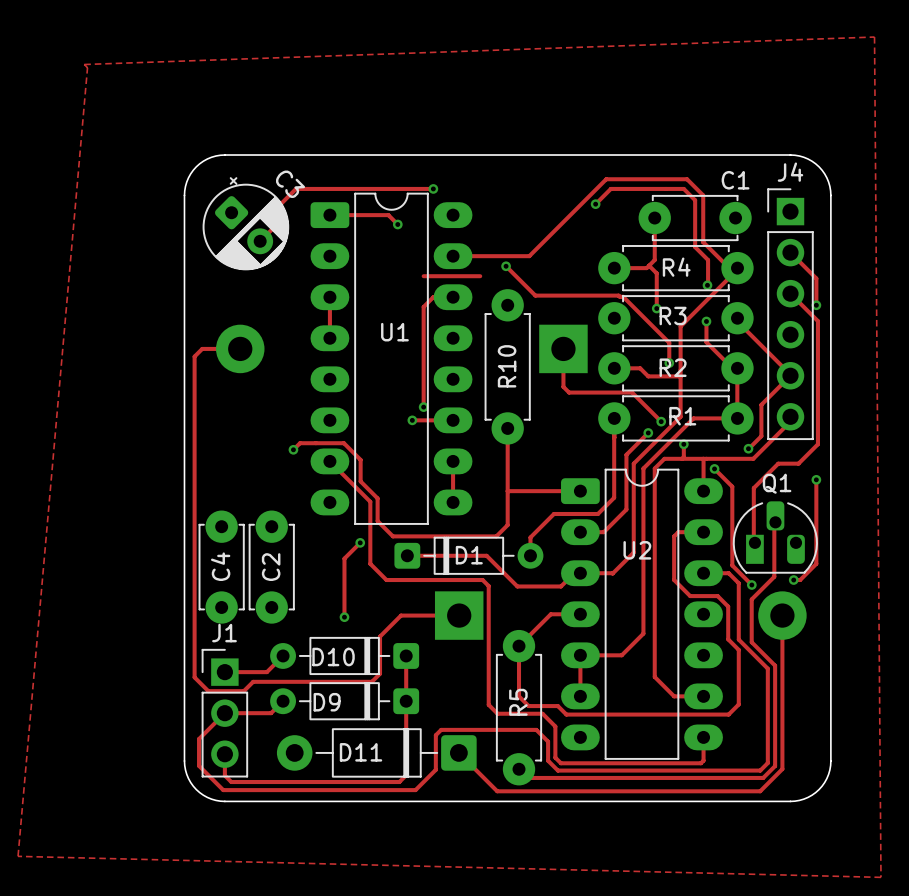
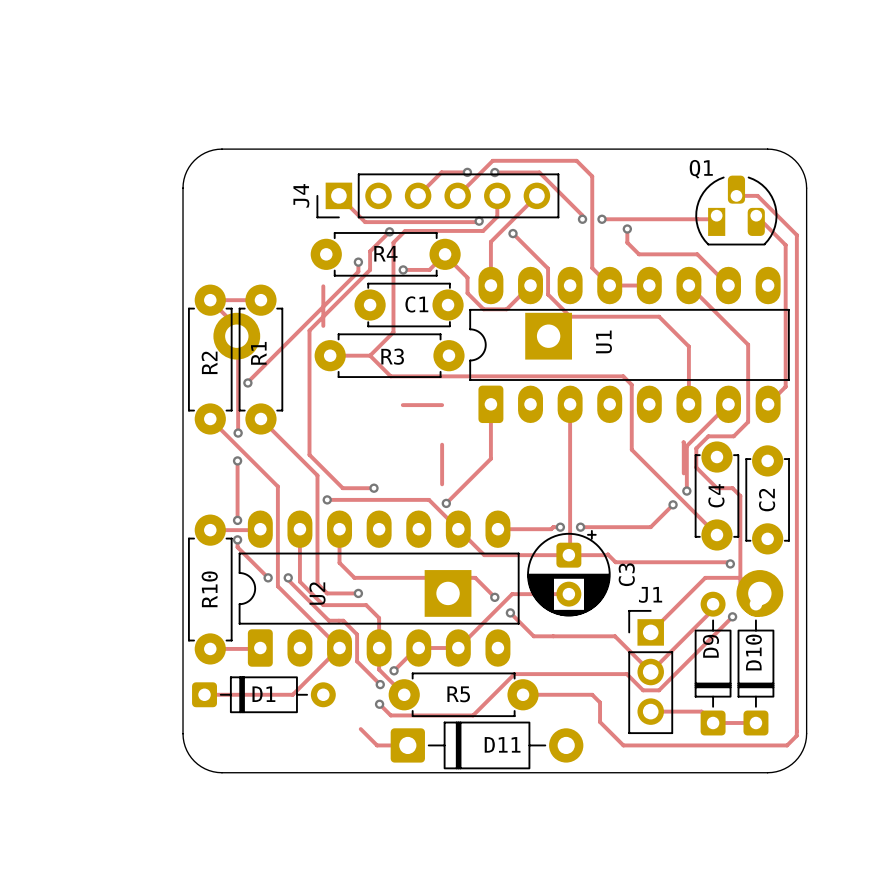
zone outline: (874, 37) (84, 64) (87, 67) (18, 856) (880, 877) (874, 37) -> none
track: none -> (467, 172) (441, 172) (418, 195)
via: none -> (467, 172)
track: none -> (494, 172) (539, 172) (582, 215) (582, 219)
via: none -> (494, 172)
C1 name position: C1 (735, 180) -> C1 (416, 304)
track: (433, 188) (295, 188) (274, 209) (274, 226) (260, 241) -> none
via: (433, 188) -> none
track: none -> (338, 195) (365, 222) (479, 221)
track: none -> (457, 195) (492, 160) (576, 160) (592, 176) (592, 268) (609, 285) (649, 285)
track: none -> (497, 195) (497, 216) (483, 230) (405, 230) (393, 242) (393, 332) (370, 355)
track: none -> (536, 195) (490, 241) (490, 285)
track: none -> (736, 195) (757, 195) (796, 235) (796, 735) (787, 745) (623, 745) (600, 722) (600, 702) (592, 694) (523, 694)
track: (595, 204) (610, 188) (683, 188) (695, 200) (695, 247) (708, 260) (707, 285) -> none
via: (595, 204) -> none
track: (329, 215) (388, 215) (397, 224) -> none
track: (654, 218) (654, 260) (646, 268) (615, 268) (610, 272) -> none
C1 position: (695, 218) -> (409, 305)
C3 rotation: 0° (245, 223) -> 45° clockwise (568, 573)
C3 position: (245, 223) -> (568, 573)
via position: (397, 224) -> (389, 231)
track: none -> (716, 215) (713, 219) (602, 219)
track: none -> (756, 215) (785, 245) (785, 386) (768, 404)
via: none -> (582, 219)
via: none -> (602, 219)
via: none -> (479, 221)
track: none -> (627, 229) (627, 242) (639, 254) (697, 254) (728, 285)
via: none -> (627, 229)
track: none -> (389, 231) (370, 251) (370, 269) (309, 330) (309, 454) (342, 488) (373, 488)
track: none -> (513, 233) (548, 268) (548, 294) (570, 316) (659, 316) (688, 346) (688, 404)
via: none -> (513, 233)
track: (703, 242) (703, 195) (687, 179) (606, 179) (529, 256) (453, 256) -> none
track: (703, 242) (734, 272) (680, 326) (680, 416) (633, 463) (633, 552) (612, 573) (574, 573) (561, 586) (517, 586) (486, 555) (407, 555) -> none
track: (790, 252) (816, 278) (816, 305) -> none
track: (649, 265) (656, 273) (656, 308) -> none
track: (506, 266) (535, 295) (623, 296) (669, 342) (669, 363) -> none
via: (506, 266) -> none
R4 position: (675, 268) -> (385, 254)
track: none -> (358, 262) (358, 271) (247, 382)
via: none -> (358, 262)
track: (423, 276) (480, 276) -> none
track: none -> (403, 269) (429, 269) (445, 254) (467, 277) (467, 293) (483, 309) (506, 309) (530, 285)
via: none -> (403, 269)
via: (707, 285) -> none
track: (790, 293) (817, 321) (817, 444) (798, 463) (778, 463) (753, 488) (754, 542) -> none
track: none -> (688, 285) (748, 344) (748, 421) (733, 436) (708, 436) (696, 448) (696, 467) (716, 488) (732, 488) (740, 495) (740, 588) (755, 604)
track: (453, 297) (433, 297) (423, 306) (423, 407) -> none
via: (816, 305) -> none
via: (656, 308) -> none
track: none -> (260, 300) (210, 300) (238, 328) (238, 433)
J4 rotation: 0° (790, 314) -> 90° counterclockwise (437, 195)
J4 position: (790, 314) -> (437, 195)
R3 name position: R3 (673, 316) -> R3 (392, 356)
R3 position: (675, 318) -> (389, 355)
track: (706, 321) (706, 342) (737, 373) (737, 426) -> none
via: (706, 321) -> none
track: (737, 321) (790, 374) (761, 404) (761, 436) (748, 448) -> none
track: (240, 348) (202, 348) (194, 356) (194, 677) (208, 691) (243, 691) (253, 681) (371, 681) (380, 673) (380, 636) (401, 615) (459, 615) -> none
track: (563, 348) (563, 386) (569, 392) (632, 392) (661, 421) (659, 421) -> none
U1 rotation: 0° (391, 358) -> 90° counterclockwise (629, 344)
U1 position: (391, 358) -> (629, 344)
via: (669, 363) -> none
R10 position: (507, 366) -> (210, 589)
track: (614, 368) (640, 368) (648, 376) (680, 376) -> none
R2 rotation: 0° (675, 368) -> 90° clockwise (210, 359)
R2 position: (675, 368) -> (210, 359)
track: none -> (330, 355) (370, 355)
track: none -> (370, 355) (390, 376) (623, 376) (631, 384) (631, 449) (716, 534)
via: none -> (247, 382)
via: (423, 407) -> none
track: (790, 416) (790, 421) (753, 458) (664, 458) (654, 468) (654, 676) (674, 696) (703, 696) -> none
R1 rotation: 0° (675, 418) -> 90° clockwise (260, 359)
R1 position: (675, 418) -> (260, 359)
track: (737, 418) (693, 418) (643, 468) (643, 633) (621, 655) (580, 655) (580, 696) -> none
track: none -> (490, 404) (490, 458) (446, 503)
track: none -> (570, 404) (568, 555)
track: none -> (728, 404) (686, 446) (686, 491)
via: (412, 420) -> none
via: (661, 421) -> none
track: (614, 426) (614, 497) (597, 513) (553, 513) (530, 537) (530, 555) -> none
track: (507, 428) (507, 525) (496, 536) (392, 536) (377, 521) (377, 498) (360, 481) (360, 459) (343, 443) (300, 443) (293, 449) -> none
track: (648, 432) (626, 454) (626, 509) (603, 532) (580, 532) -> none
via: (648, 432) -> none
track: none -> (210, 418) (277, 486) (277, 586) (339, 648) (292, 694) (204, 694)
track: none -> (260, 418) (317, 475) (317, 583) (327, 593) (358, 593)
track: (683, 444) (682, 458) -> none
via: (683, 444) -> none
via: (748, 448) -> none
via: none -> (238, 433)
via: (293, 449) -> none
track: (329, 461) (370, 501) (370, 563) (386, 580) (482, 580) (488, 586) (488, 704) (497, 713) (542, 713) (555, 726) (555, 757) (560, 763) (700, 763) (703, 760) (703, 737) -> none
track: (714, 468) (732, 486) (732, 565) (751, 585) -> none
via: (714, 468) -> none
track: none -> (237, 460) (237, 520)
via: none -> (237, 460)
track: (816, 479) (816, 563) (800, 580) (793, 580) -> none
via: (816, 479) -> none
Q1 name position: Q1 (777, 483) -> Q1 (701, 169)
track: (507, 491) (580, 491) -> none
via: none -> (373, 488)
via: none -> (686, 491)
track: none -> (327, 499) (429, 499) (484, 555) (607, 554) (615, 562) (728, 562)
via: none -> (327, 499)
via: none -> (446, 503)
track: (775, 522) (774, 576) (751, 599) (751, 642) (775, 665) (775, 766) (763, 777) (527, 777) (519, 769) -> none
track: none -> (673, 504) (650, 527) (580, 527)
via: none -> (673, 504)
track: (703, 532) (678, 532) (674, 536) (674, 580) (690, 596) (717, 596) (728, 606) (728, 639) (738, 649) (738, 704) (728, 714) (566, 714) (557, 706) (528, 706) (519, 696) (519, 646) (550, 614) (580, 614) -> none
Q1 position: (775, 537) -> (736, 210)
via: none -> (237, 520)
track: (360, 542) (344, 558) (344, 617) -> none
via: (360, 542) -> none
track: none -> (560, 527) (553, 527) (551, 529) (497, 529)
via: none -> (560, 527)
via: none -> (580, 527)
track: none -> (260, 529) (210, 530)
track: none -> (299, 529) (299, 581) (323, 605) (366, 605) (379, 618) (379, 669) (404, 694)
track: none -> (339, 529) (339, 562) (354, 577) (475, 577) (494, 597)
D1 position: (468, 555) -> (263, 694)
track: none -> (237, 539) (237, 547) (268, 577)
via: none -> (237, 539)
C4 rotation: 0° (221, 567) -> 180° (716, 495)
C4 position: (221, 567) -> (716, 495)
C2 rotation: 0° (271, 567) -> 180° (767, 499)
C2 position: (271, 567) -> (767, 499)
track: (703, 573) (728, 573) (738, 583) (738, 639) (767, 668) (767, 763) (760, 770) (557, 770) (548, 760) (548, 741) (536, 729) (441, 729) (435, 735) (435, 769) (415, 790) (223, 790) (199, 765) (199, 739) (224, 713) (271, 713) (283, 701) -> none
via: (793, 580) -> none
via: none -> (268, 577)
track: none -> (288, 577) (328, 620) (343, 620) (357, 634) (357, 661) (380, 684)
via: none -> (288, 577)
track: none -> (740, 577) (705, 577) (650, 632)
U2 rotation: 0° (641, 614) -> 90° counterclockwise (379, 588)
U2 position: (641, 614) -> (379, 588)
track: (782, 615) (782, 769) (760, 791) (497, 791) (458, 752) -> none
track: none -> (568, 594) (512, 594) (458, 648) (416, 648) (394, 670)
via position: (344, 617) -> (358, 593)
via: none -> (494, 597)
track: none -> (713, 604) (713, 609) (650, 672) (615, 636) (533, 636) (510, 612)
via: none -> (510, 612)
track: none -> (732, 616) (659, 690) (643, 690) (626, 674) (514, 674) (473, 715) (390, 715) (379, 704)
via: none -> (732, 616)
track: (283, 655) (266, 672) (224, 672) -> none
D10 rotation: 0° (344, 655) -> 90° clockwise (755, 663)
D10 position: (344, 655) -> (755, 663)
track: (406, 655) (406, 775) (399, 782) (231, 782) (224, 775) (224, 754) -> none
track: none -> (260, 648) (210, 648)
via: none -> (394, 670)
D9 rotation: 0° (344, 701) -> 90° clockwise (713, 663)
D9 position: (344, 701) -> (713, 663)
R5 rotation: 0° (519, 707) -> 90° clockwise (463, 694)
via: none -> (380, 684)
J1 position: (224, 713) -> (650, 672)
via: none -> (379, 704)
track: none -> (650, 711) (701, 711) (713, 722) (755, 722)
D11 rotation: 0° (376, 752) -> 180° (487, 745)
D11 position: (376, 752) -> (487, 745)
track: none -> (360, 729) (377, 745) (407, 745)

